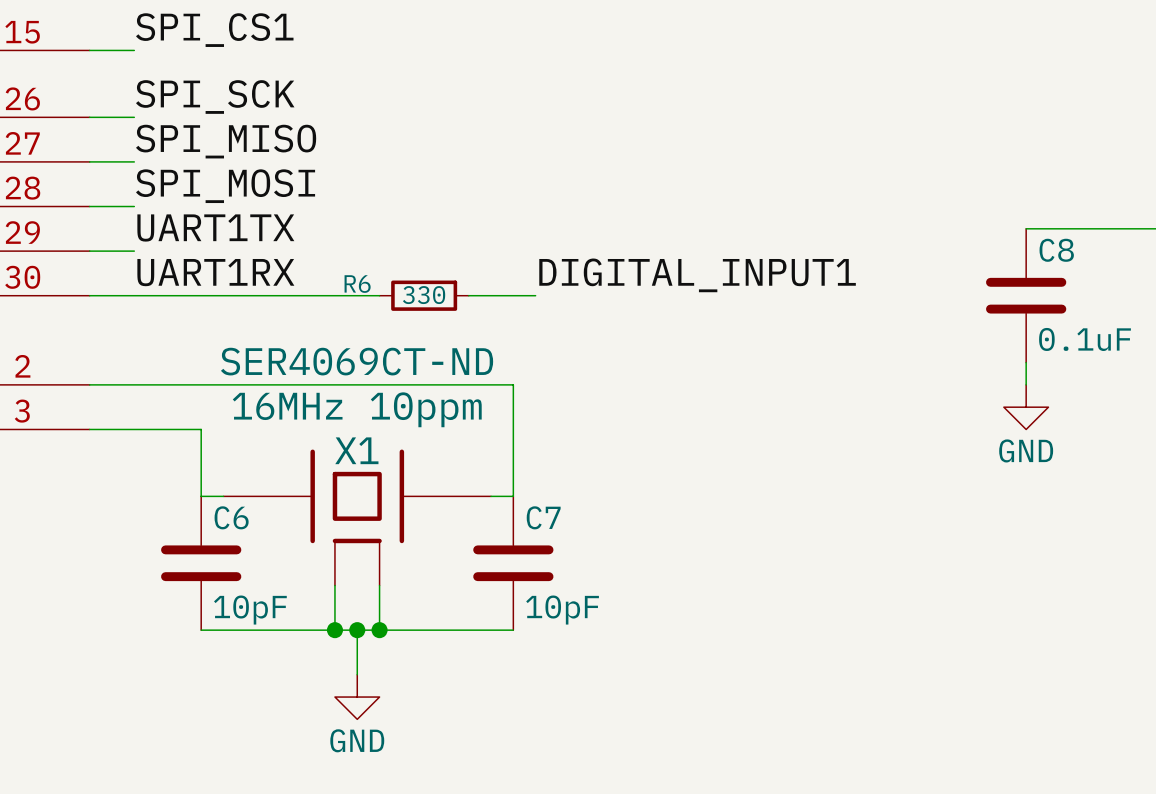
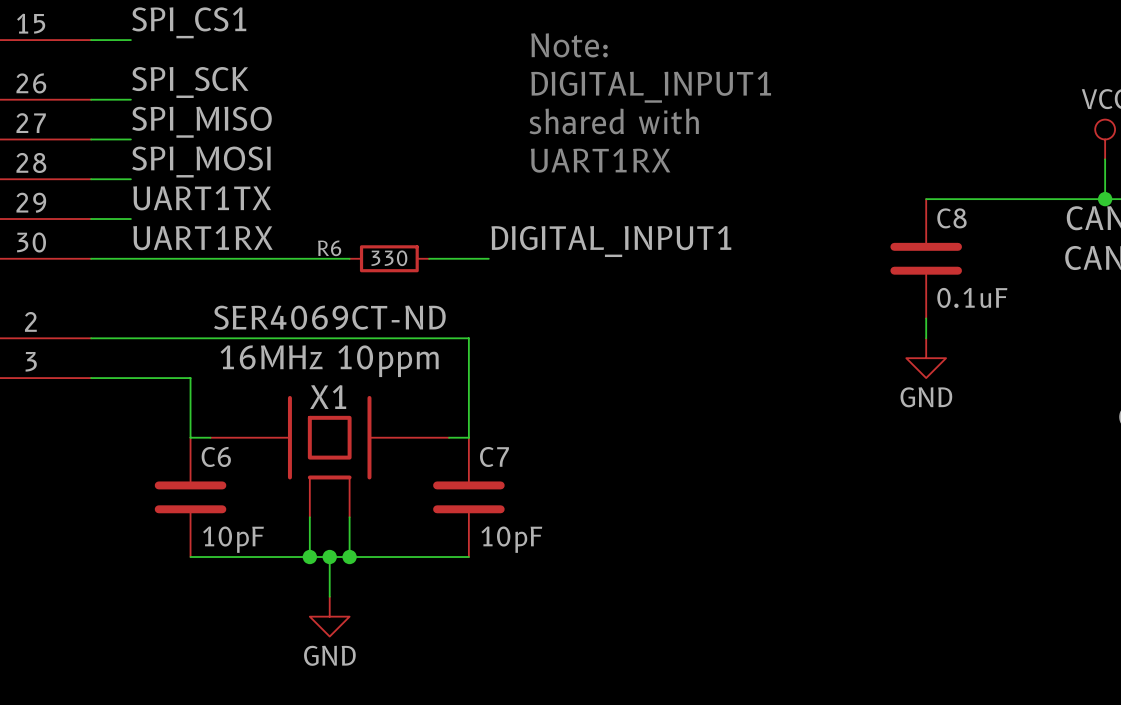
text: none -> Note: (569, 45)
text: none -> DIGITAL_INPUT1 (651, 87)
text: none -> shared with (614, 121)
text: none -> UART1RX (600, 160)

